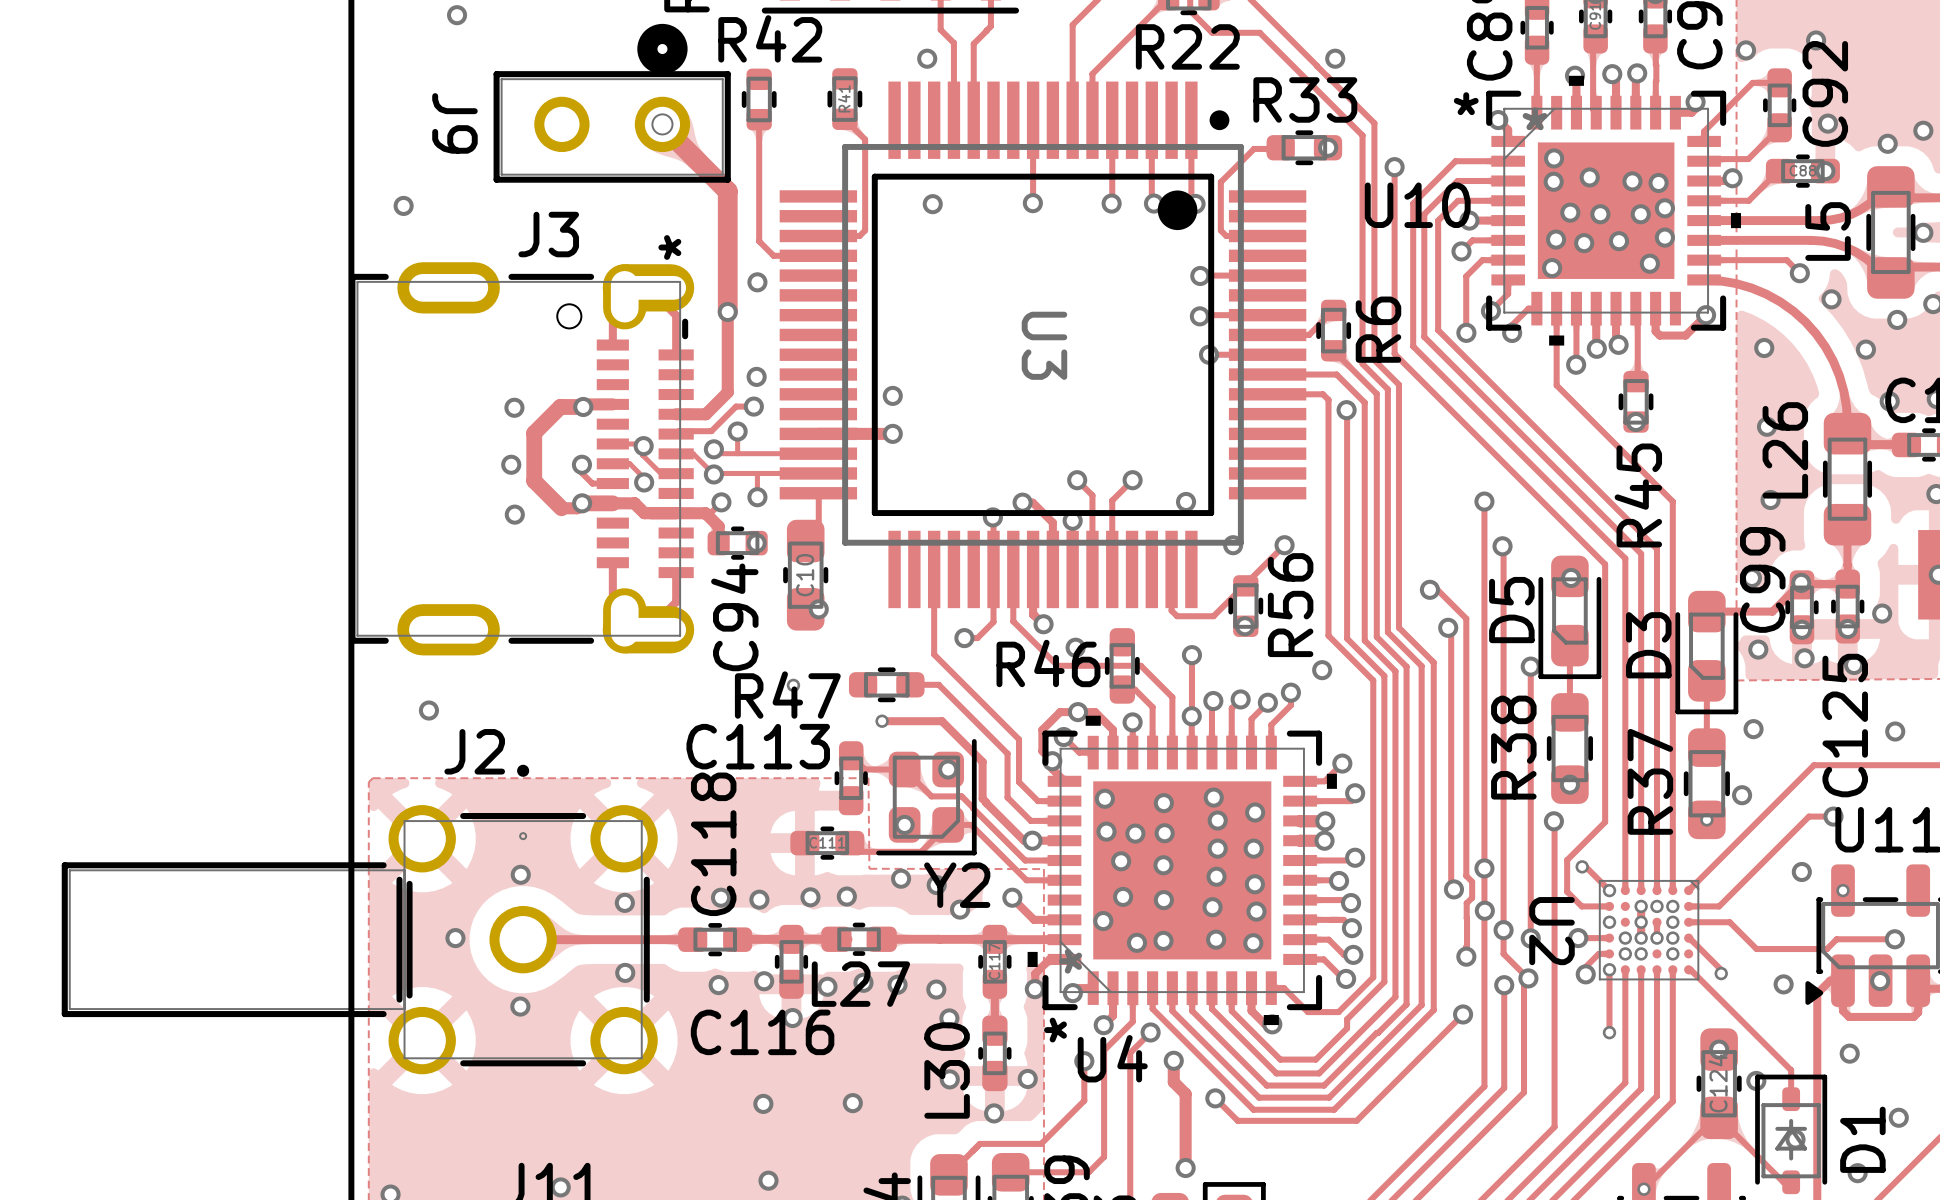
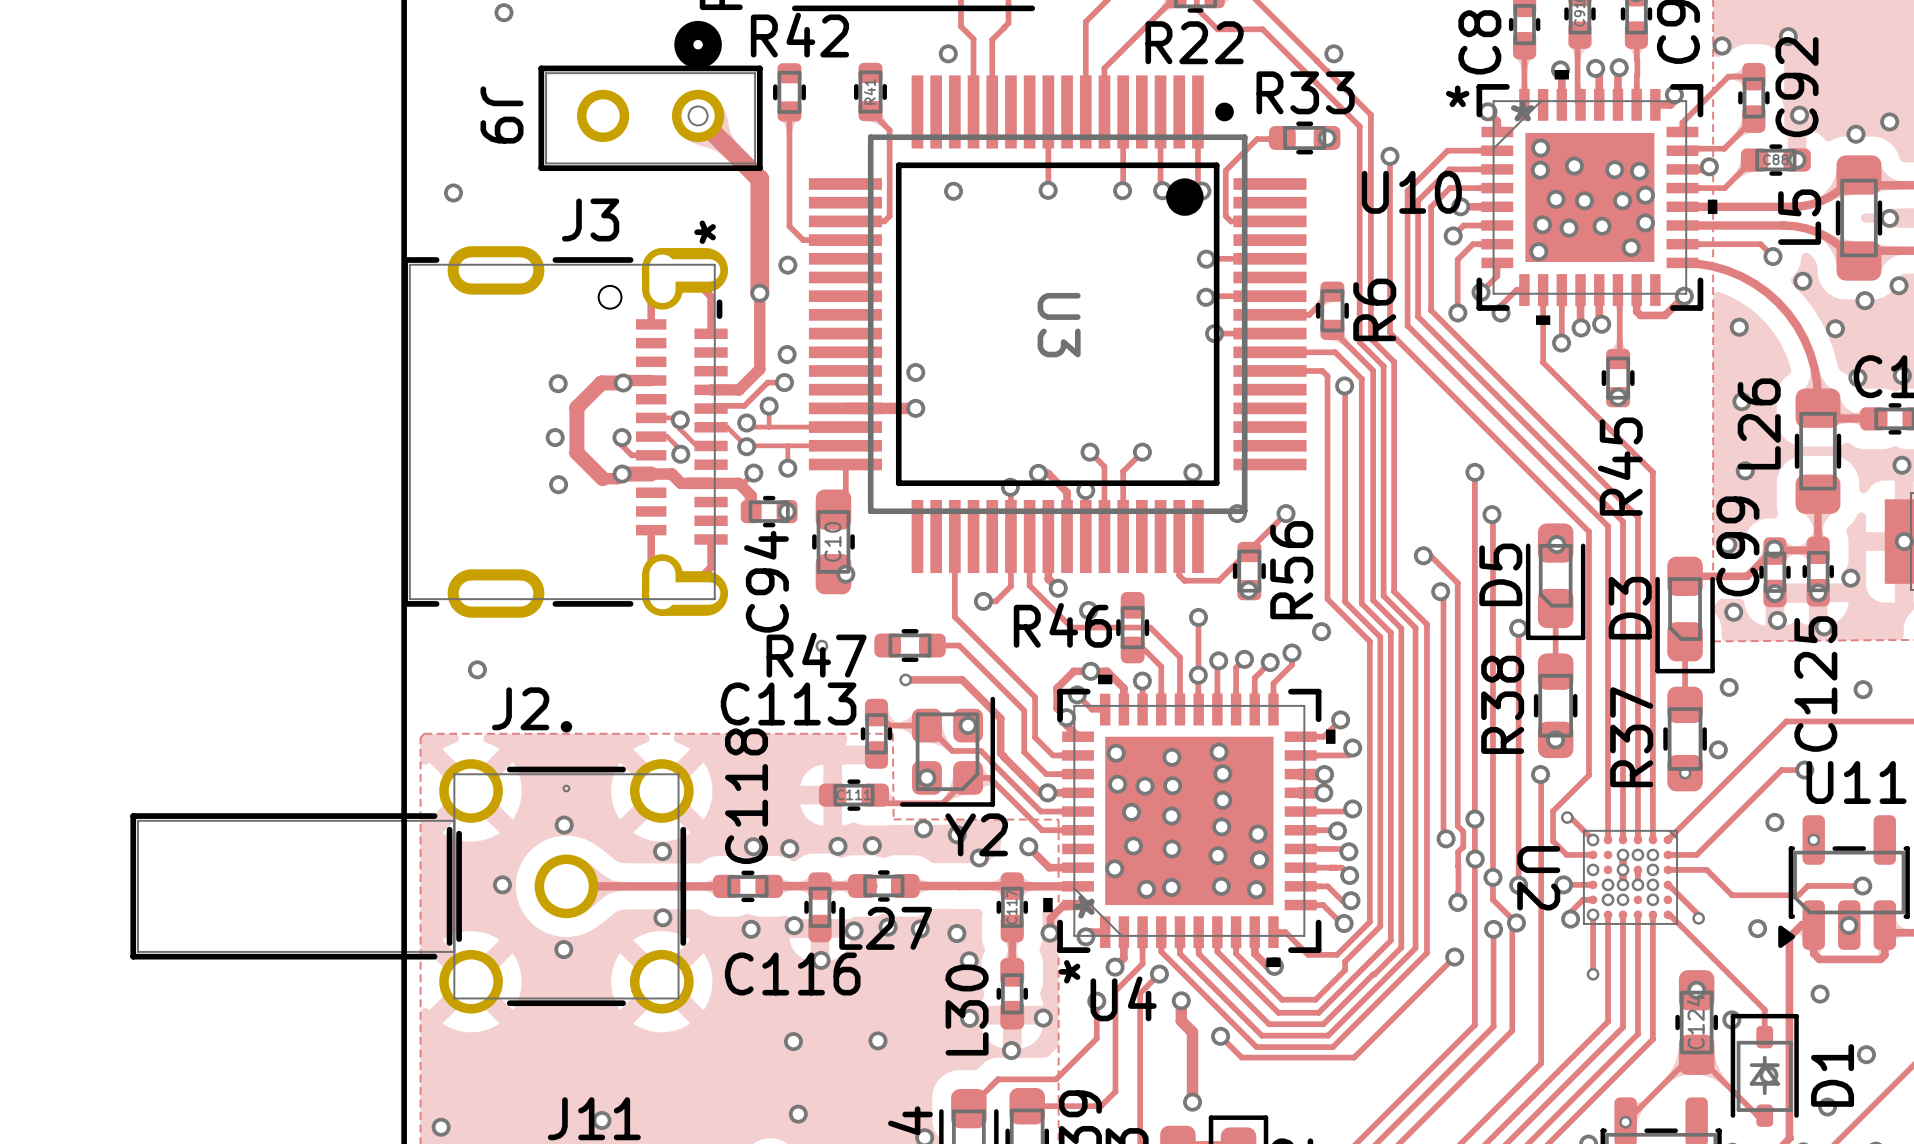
via: (1255, 812) -> none
via: (1253, 848) -> none

